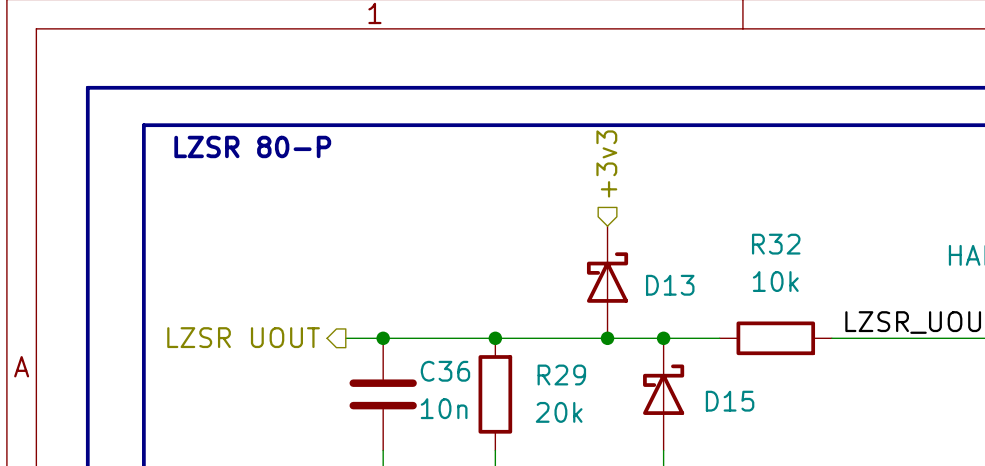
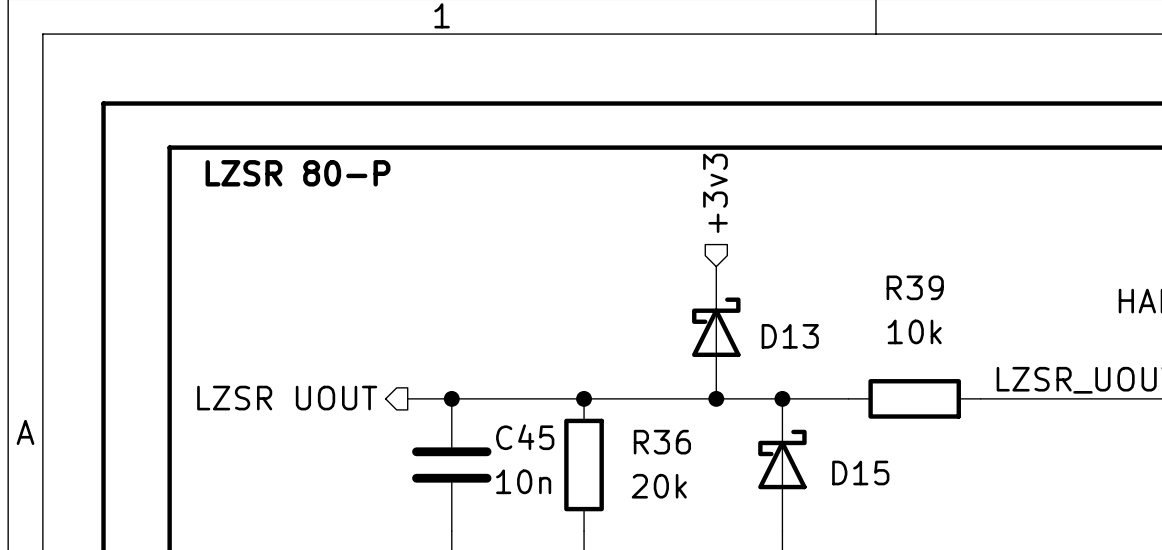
R32 name: R32 (776, 244) -> R39 (915, 287)
C36 name: C36 (445, 371) -> C45 (525, 437)
R29 name: R29 (561, 375) -> R36 (662, 442)

